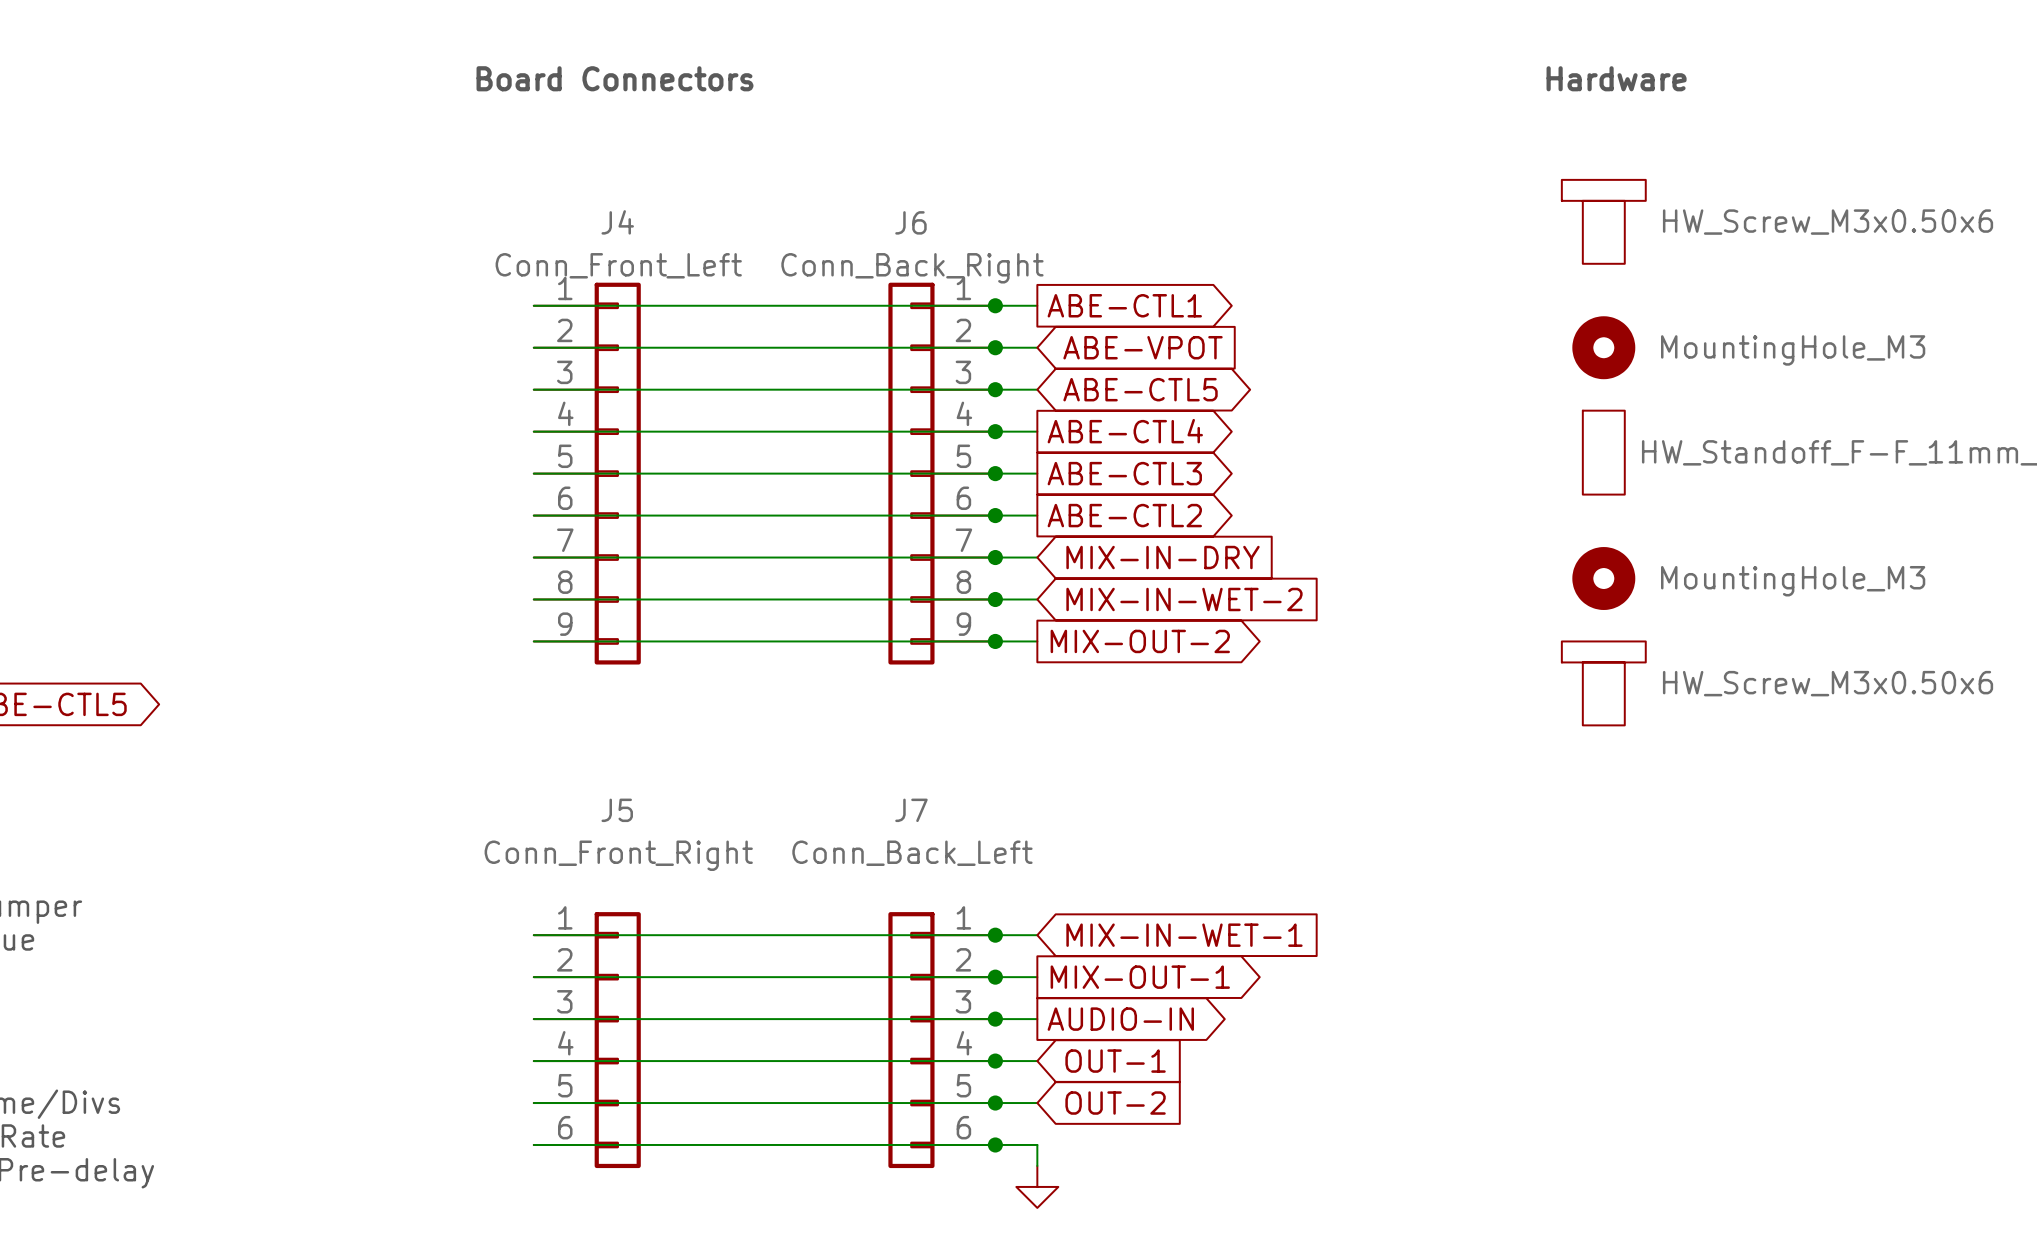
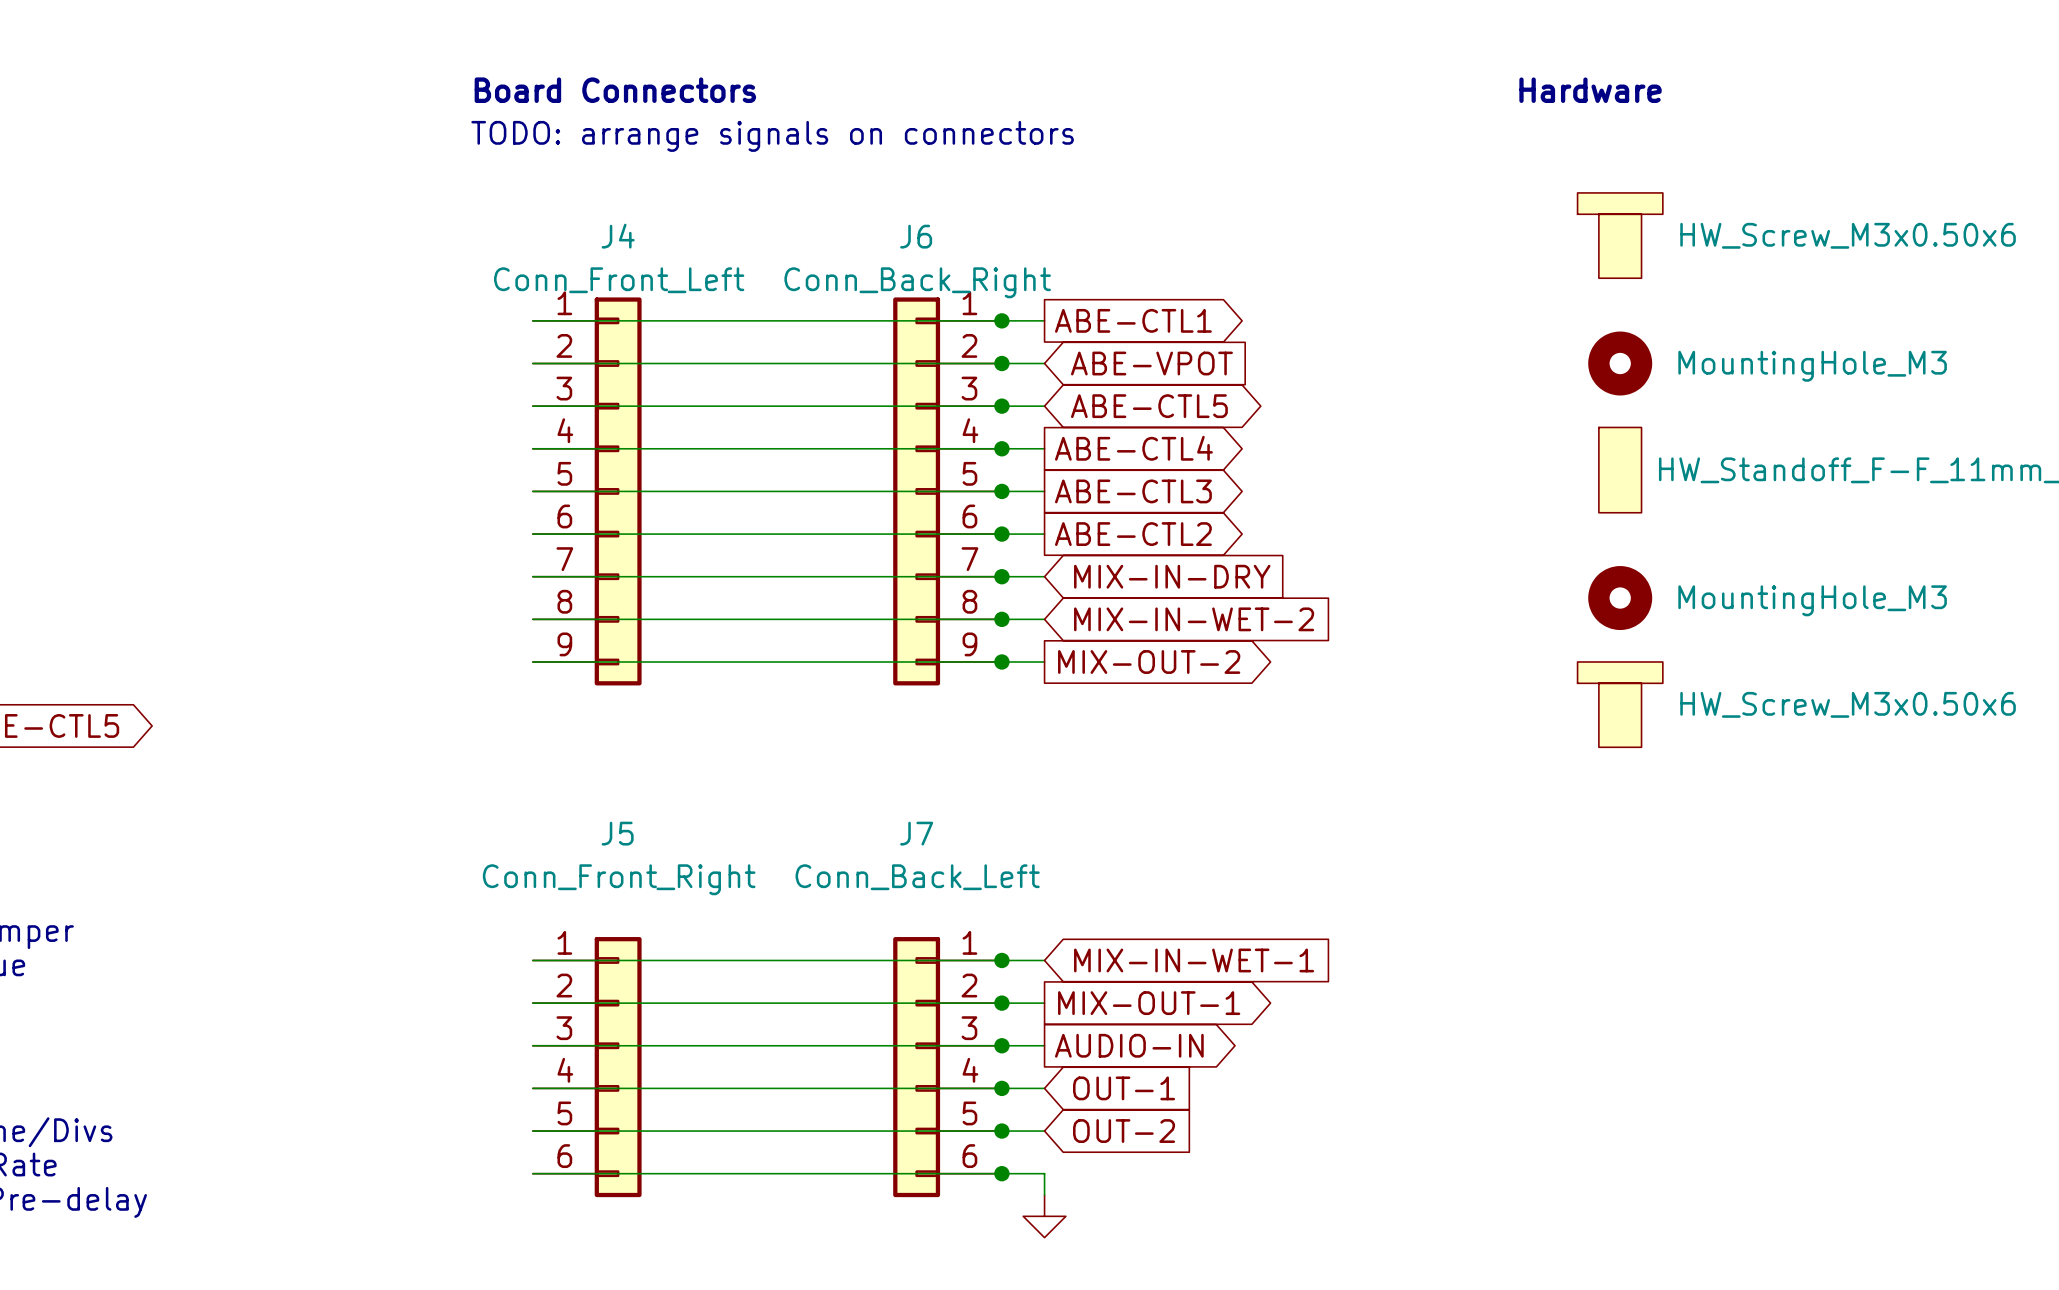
text position: Hardware (1616, 78) -> Hardware (1590, 90)
text: none -> TODO: arrange signals on connectors (772, 136)

